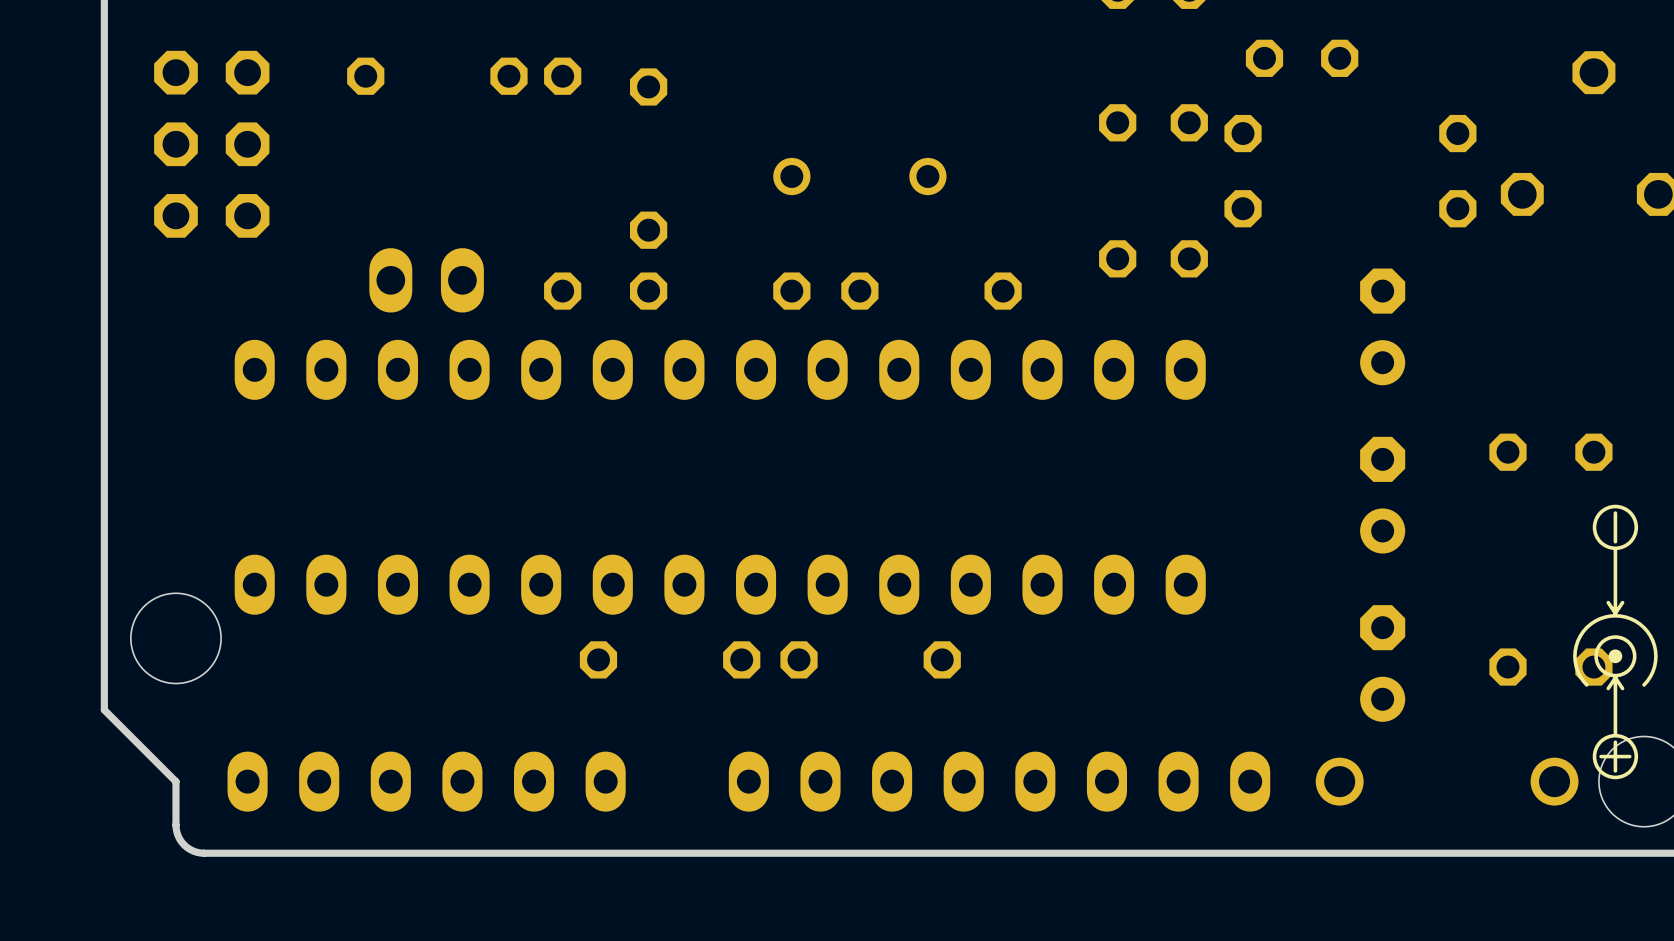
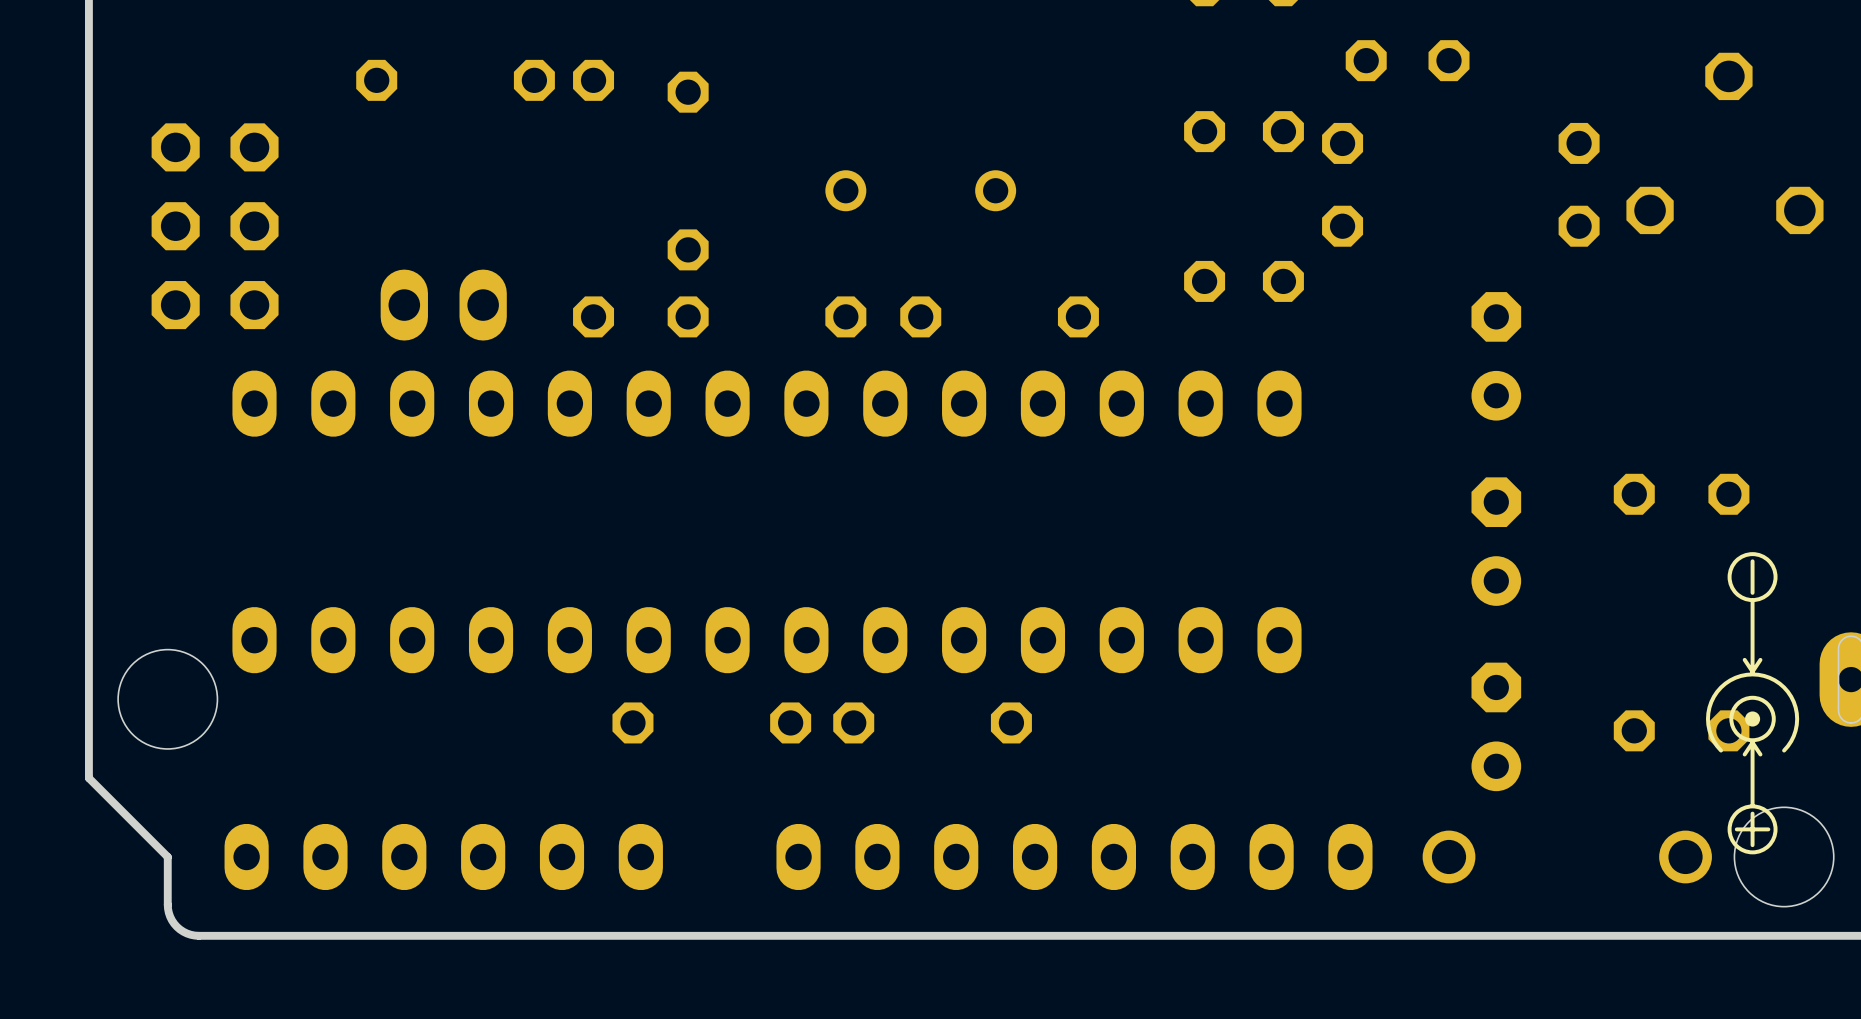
part position: (211, 144) -> (215, 226)

